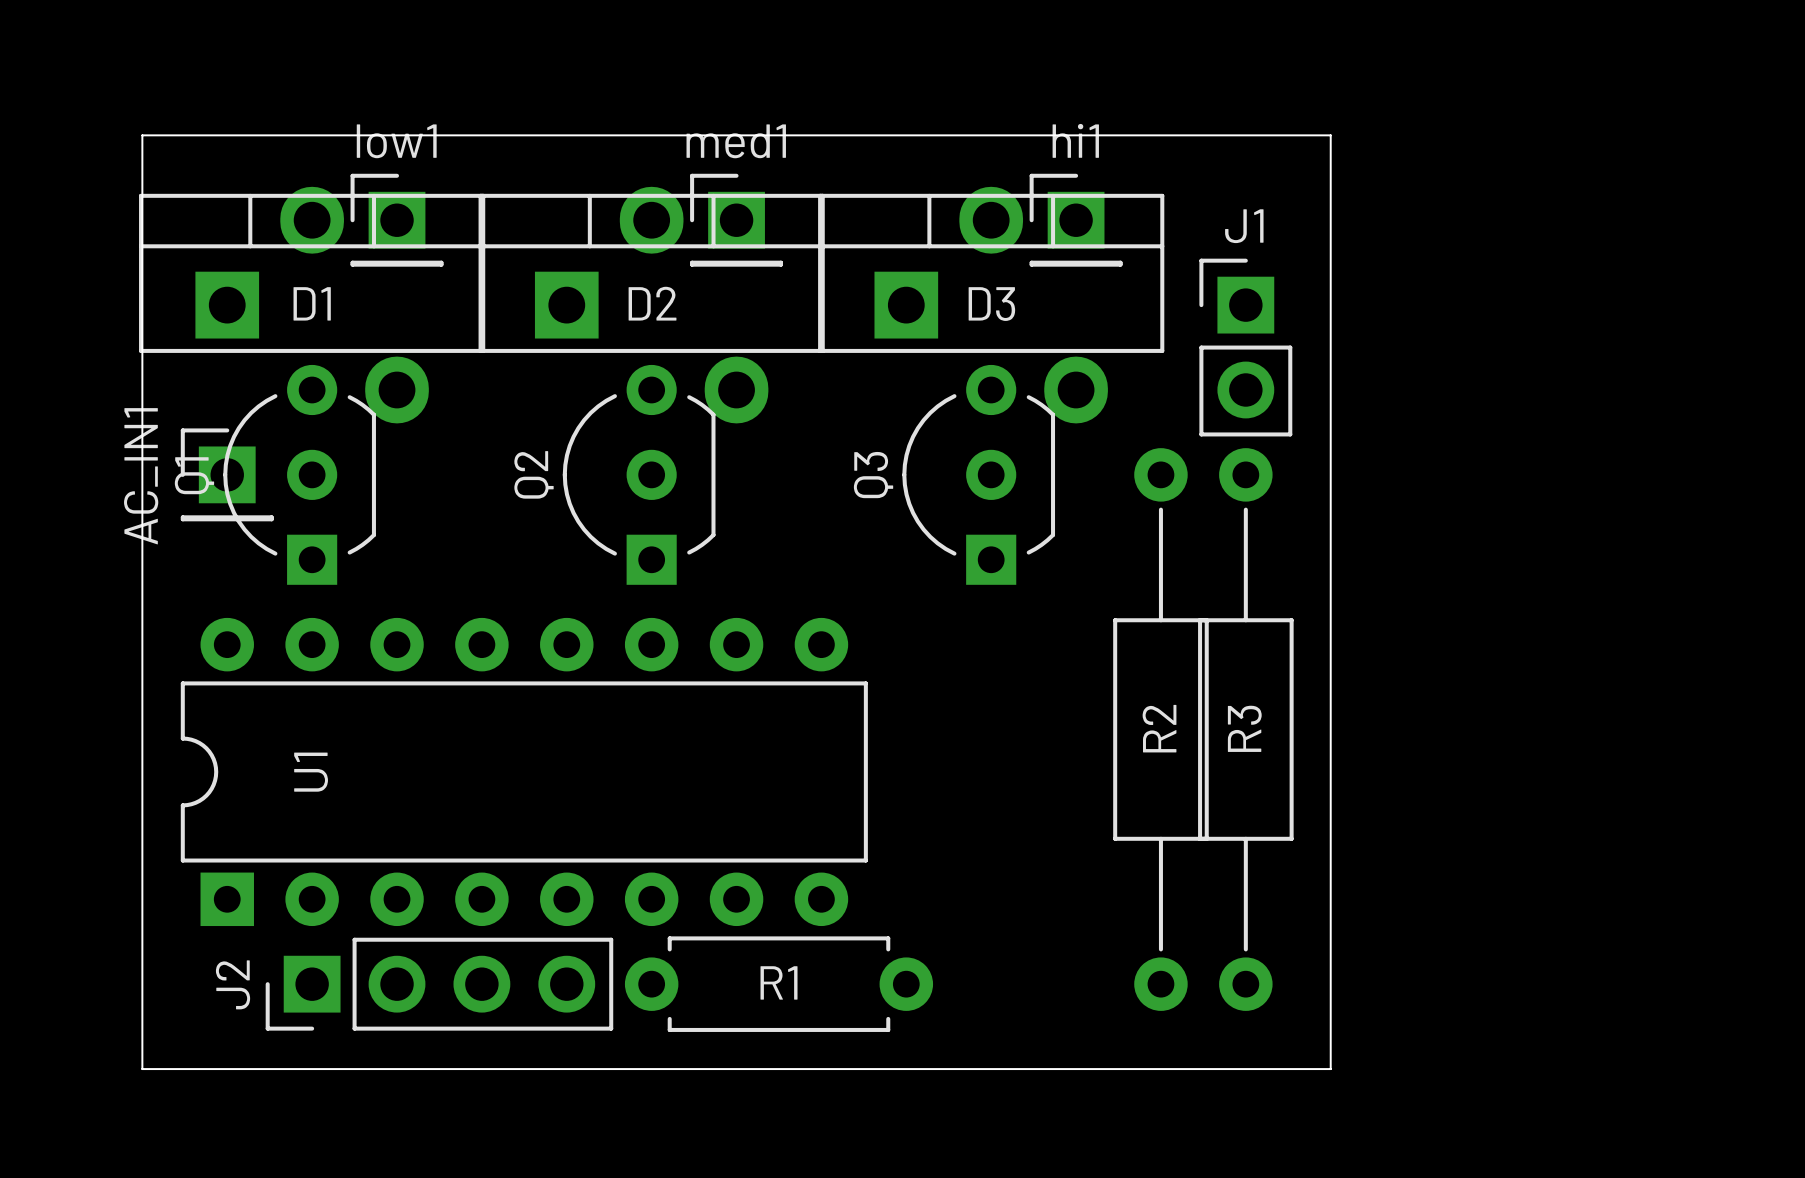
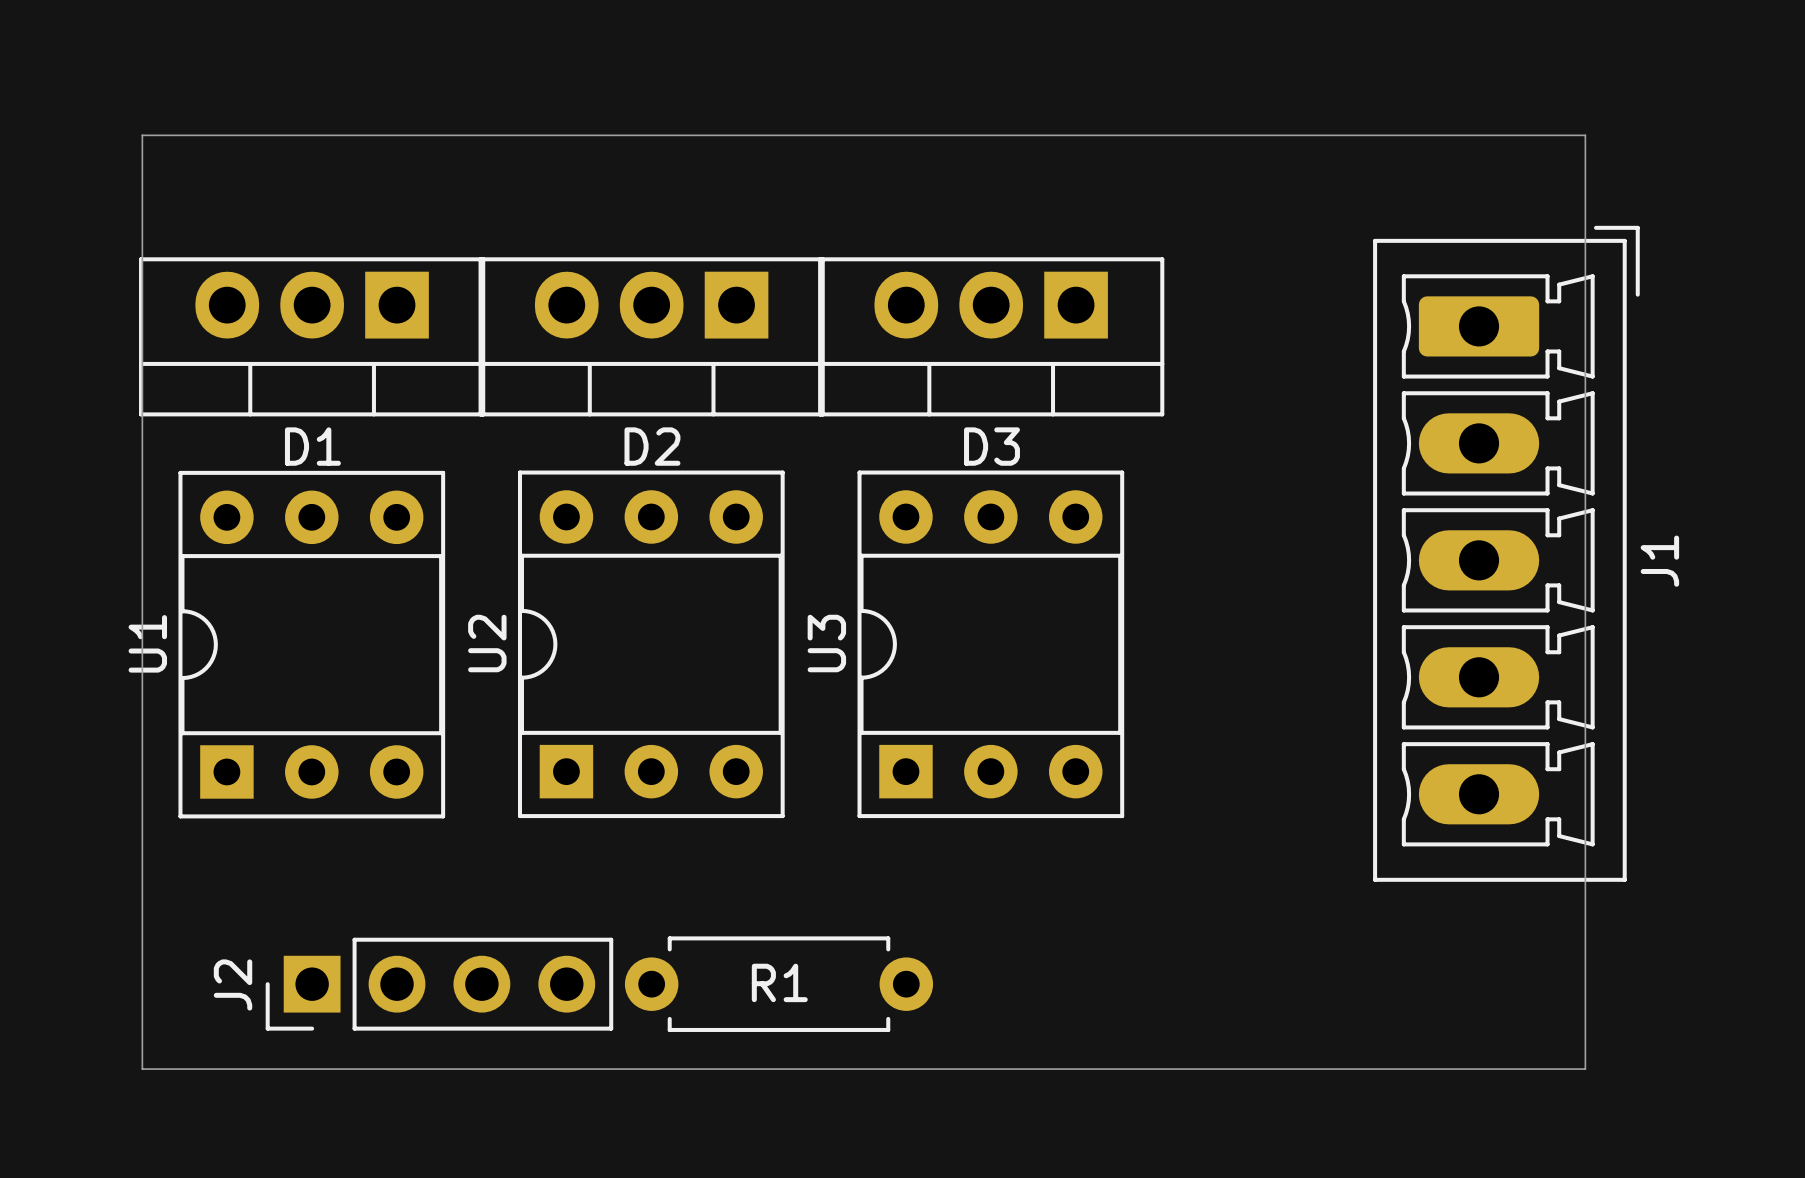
board edge: (1330, 135) (1330, 1069) -> (1330, 135) (1585, 135) (1585, 1069) (1330, 1069)
D1 footprint: [139, 186, 486, 424] -> [139, 257, 486, 417]
D2 footprint: [478, 186, 825, 424] -> [478, 257, 825, 417]
D3 footprint: [818, 186, 1165, 424] -> [818, 257, 1165, 417]
low1: (397, 220) -> none
med1: (736, 220) -> none
hi1: (1076, 220) -> none
J1 name position: J1 (1244, 226) -> J1 (1659, 561)
J1 footprint: [1199, 258, 1293, 437] -> [1373, 225, 1640, 882]
D1 name position: D1 (312, 303) -> D1 (312, 446)
D2 name position: D2 (652, 303) -> D2 (652, 446)
D3 name position: D3 (991, 304) -> D3 (991, 446)
AC_IN1: (227, 474) -> none
Q1: (299, 474) -> none
Q2: (639, 474) -> none
Q3: (978, 474) -> none
U1 footprint: [180, 617, 868, 927] -> [178, 470, 446, 819]
U2: none -> (651, 644)
U3: none -> (990, 644)
R2: (1160, 729) -> none
R3: (1245, 729) -> none

